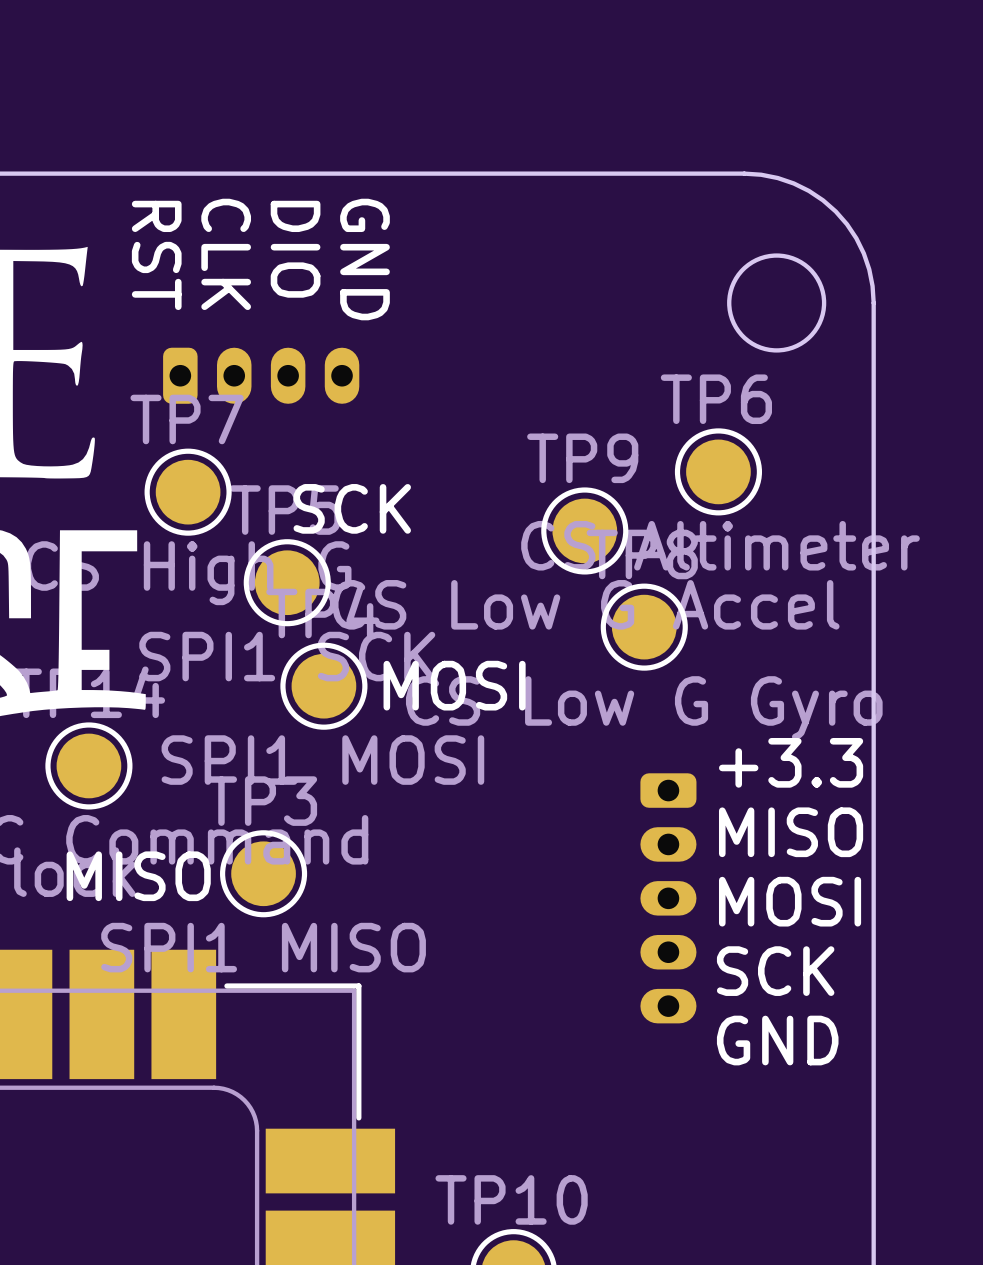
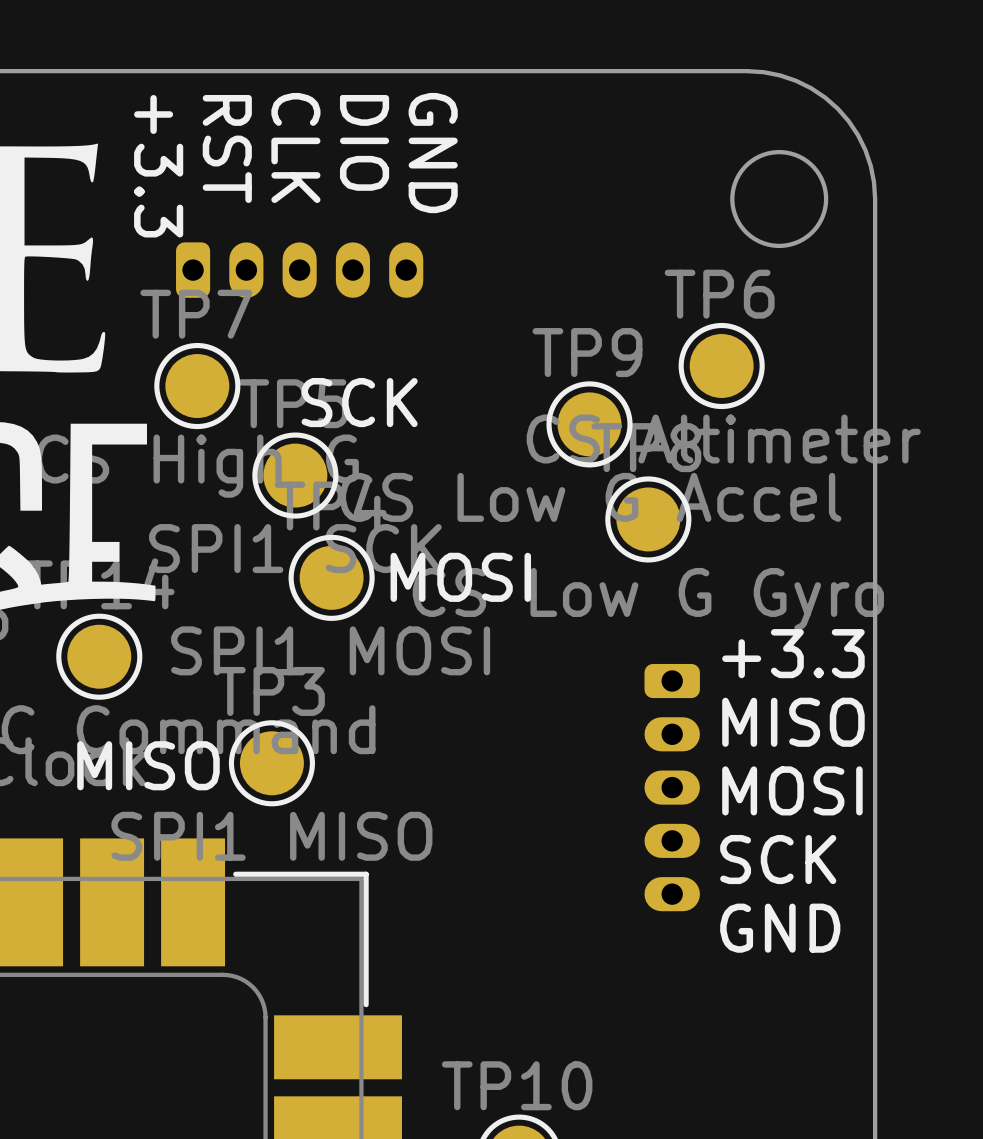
text: DIO (295, 249) -> CLK (295, 147)
text: CLK (226, 254) -> RST (227, 148)
text: RST (156, 255) -> +3.3 (158, 166)
text: none -> GND (433, 153)
text: GND (364, 259) -> DIO (364, 142)
part footprint: [163, 347, 360, 404] -> [176, 242, 424, 298]

